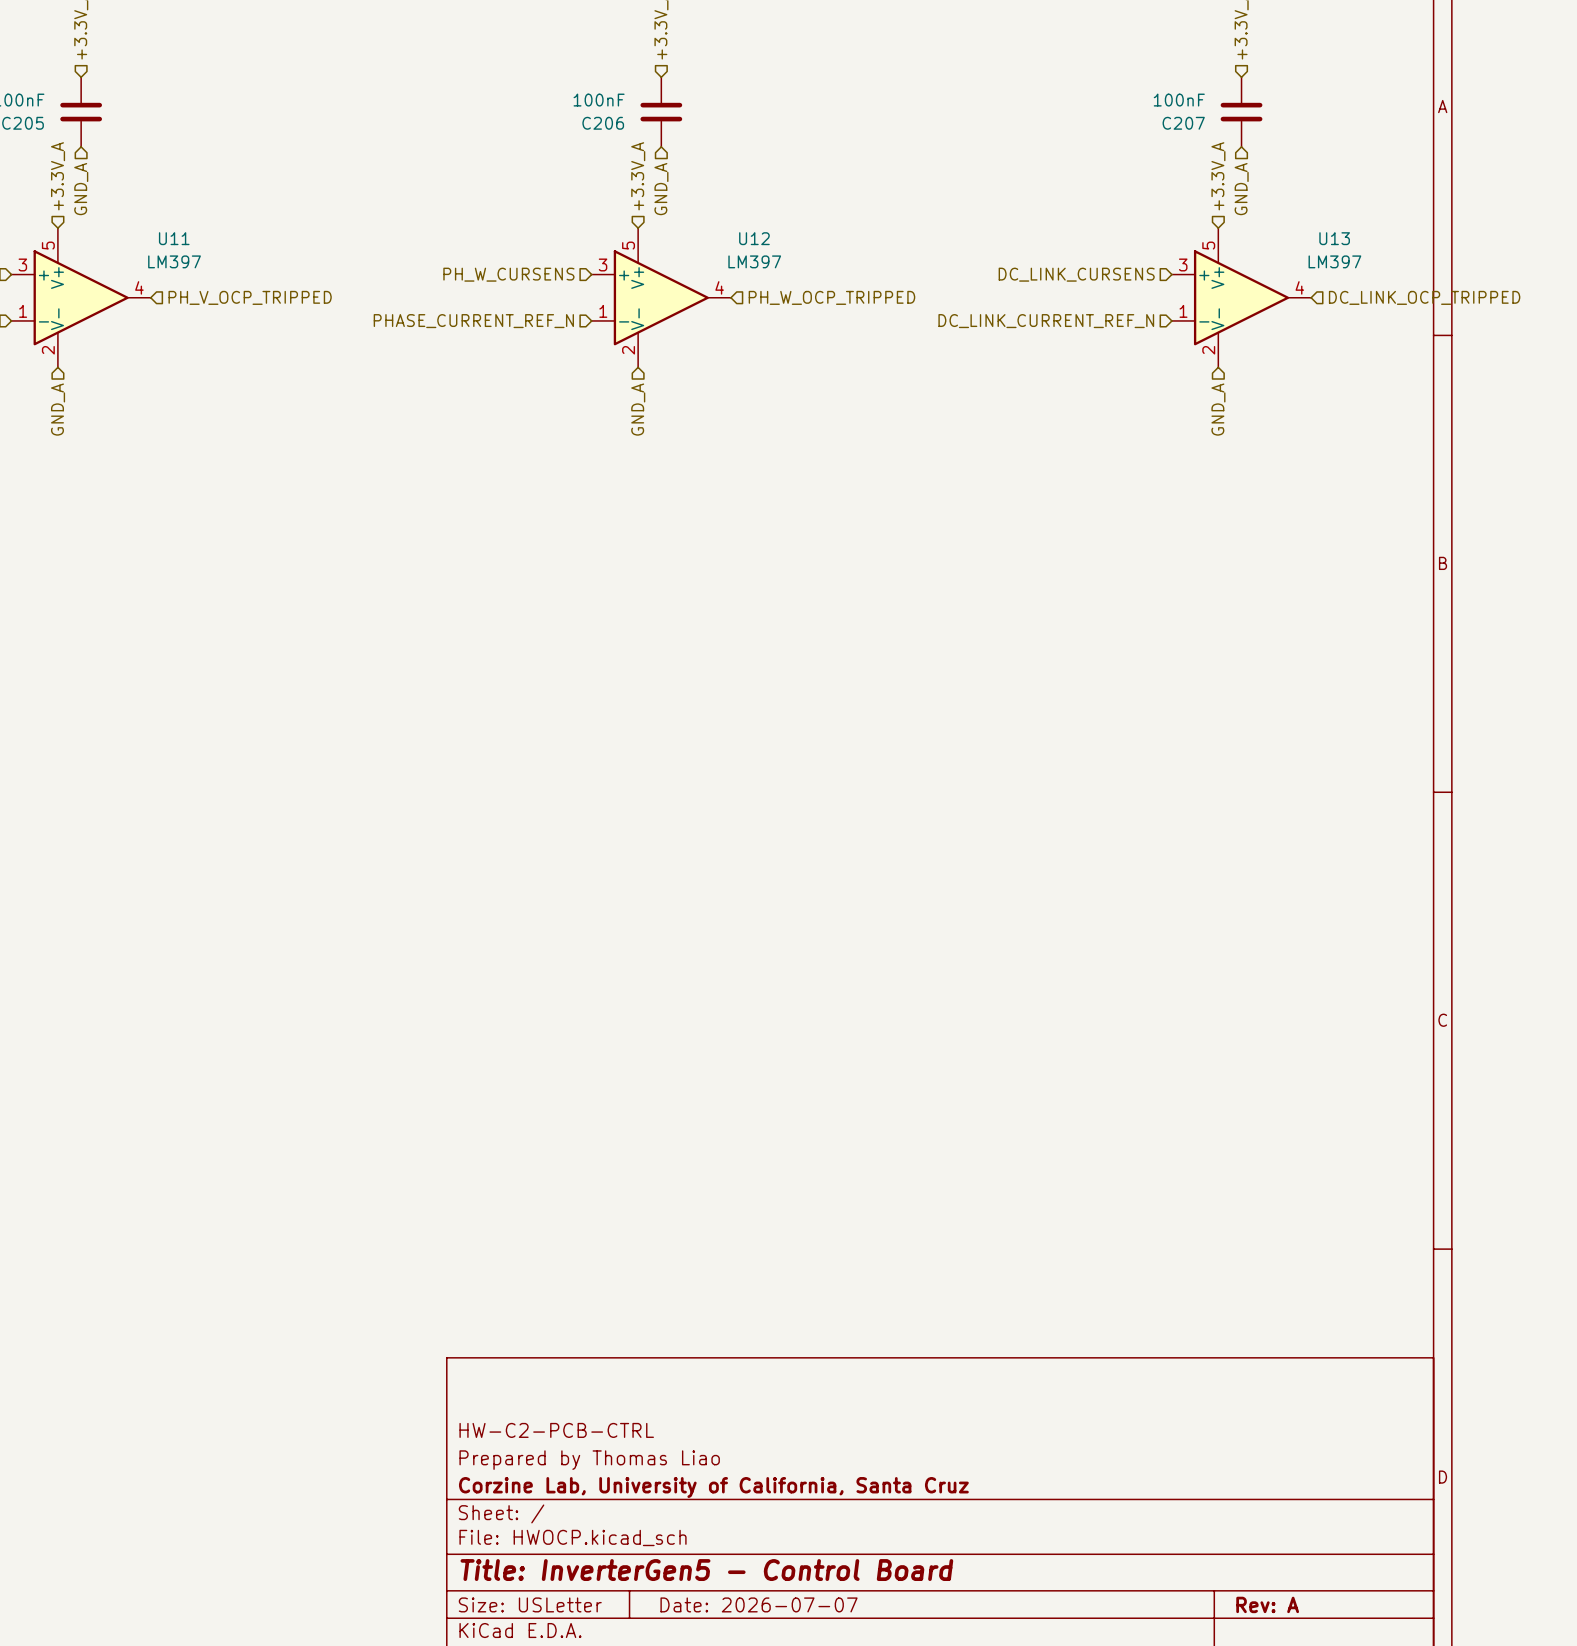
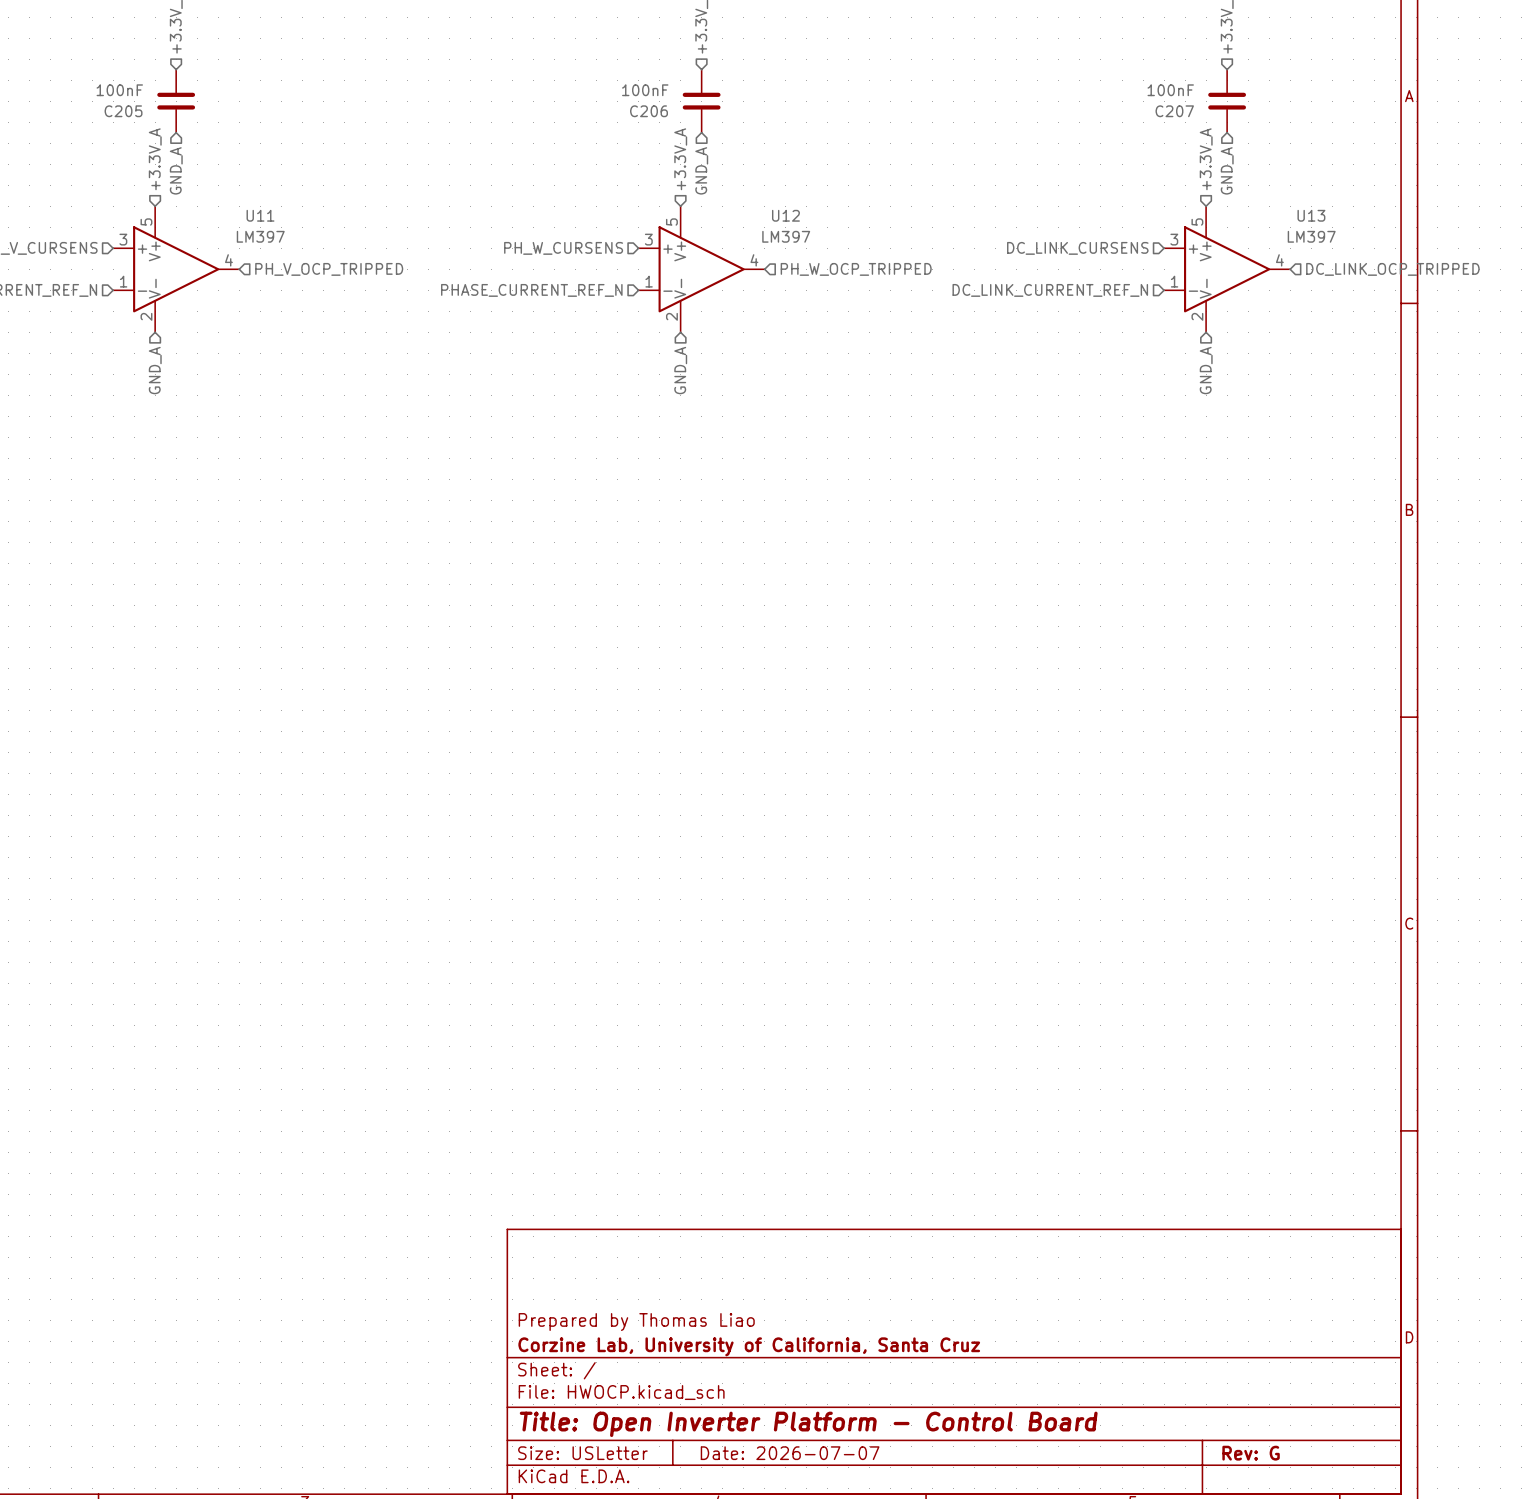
title block: HW-C2-PCB-CTRL (556, 1430) -> none
title block: Title: InverterGen5 - Control Board (706, 1570) -> Title: Open Inverter Platform - Control Board (808, 1424)
title block: Rev: A (1267, 1604) -> Rev: G (1251, 1453)

